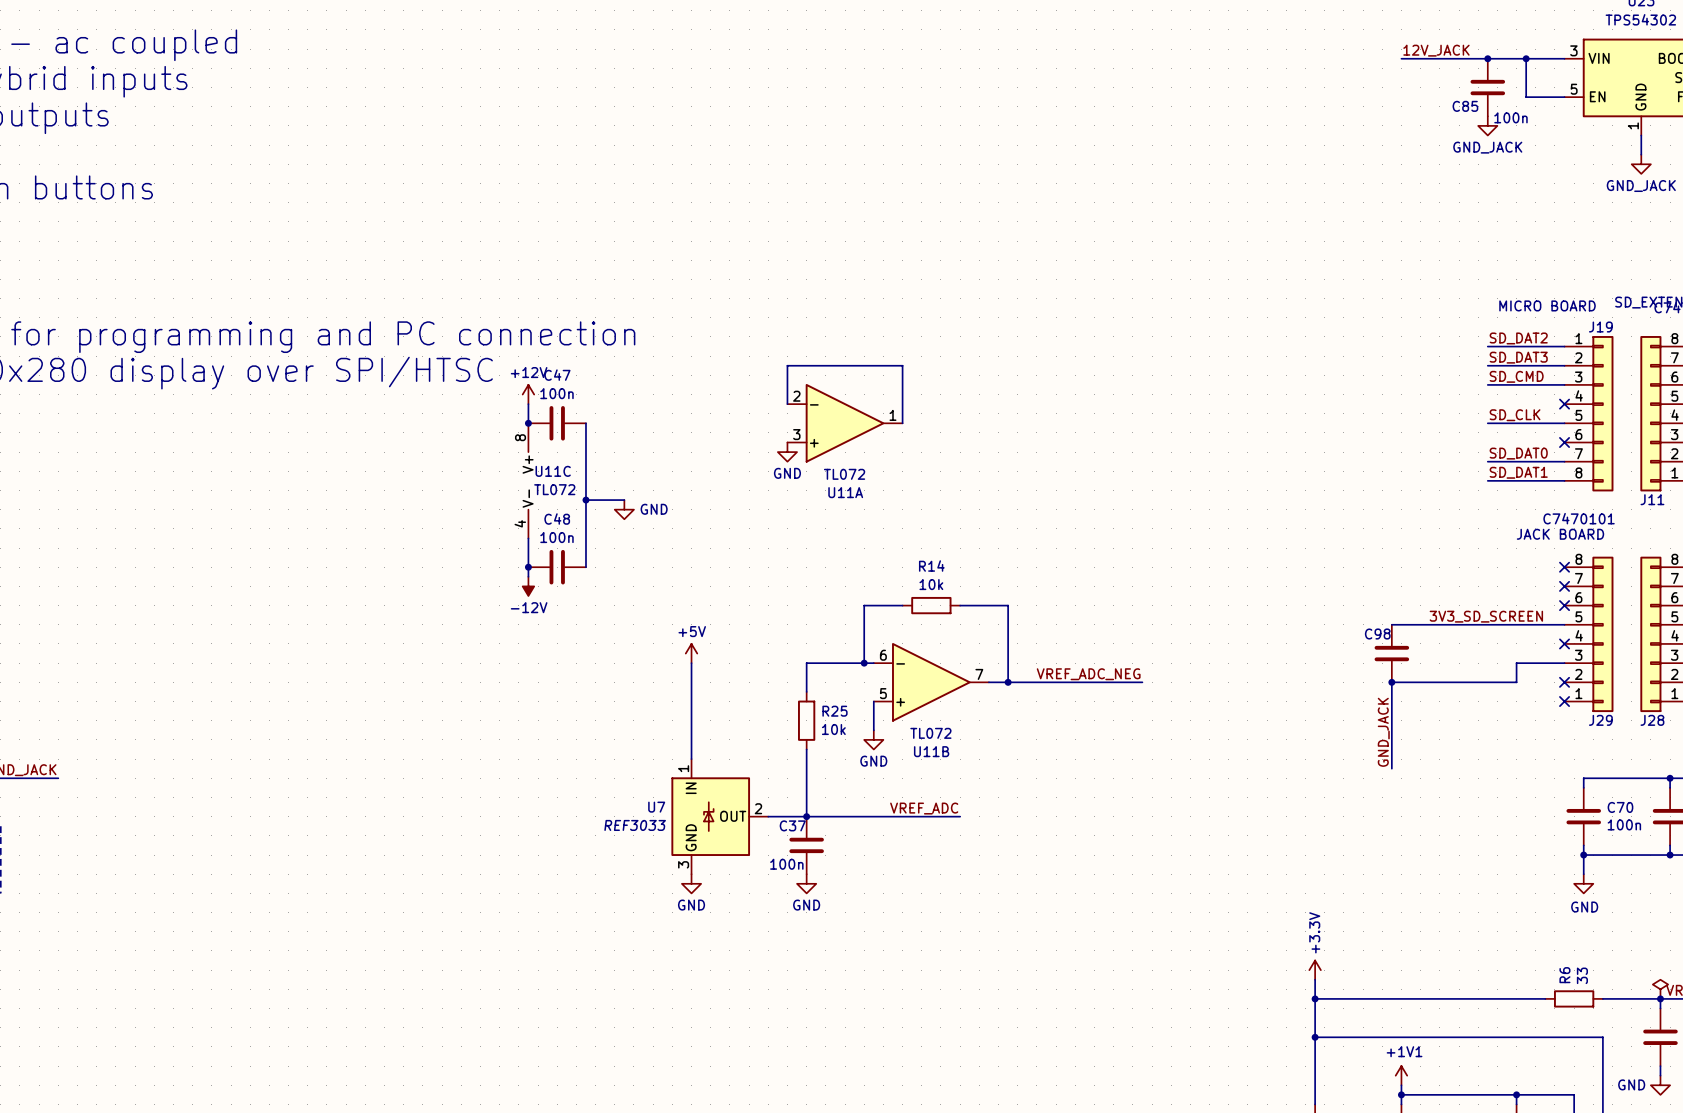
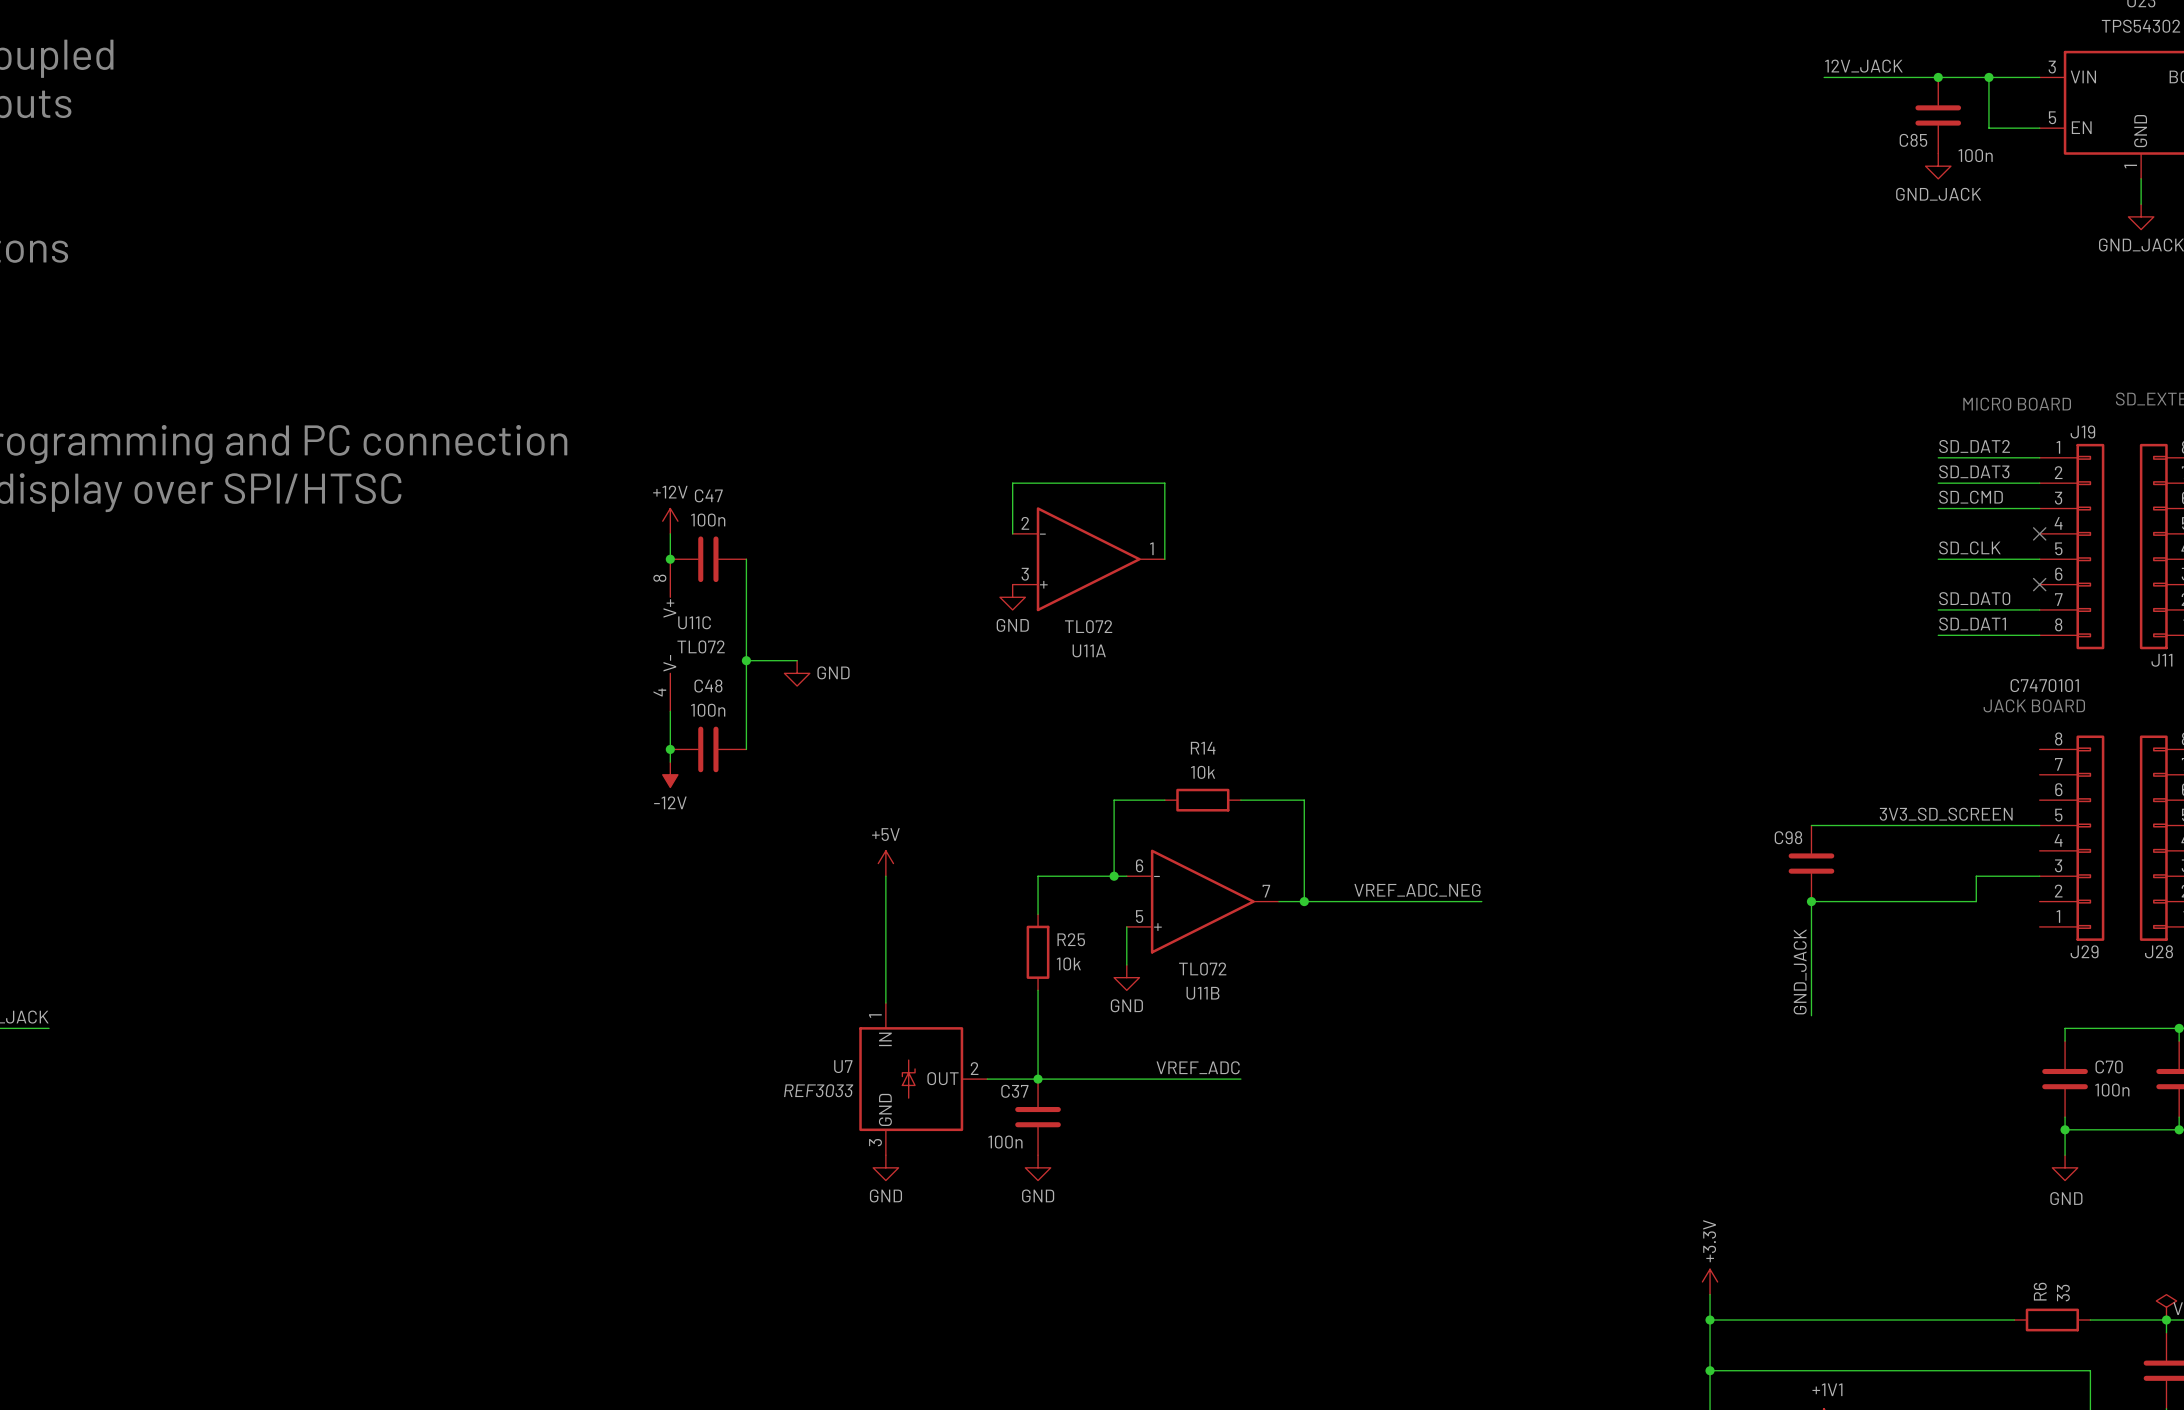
no-connect mark: (1564, 567) -> none
no-connect mark: (1564, 586) -> none
no-connect mark: (1564, 605) -> none
no-connect mark: (1564, 643) -> none
no-connect mark: (1564, 682) -> none
no-connect mark: (1564, 701) -> none

